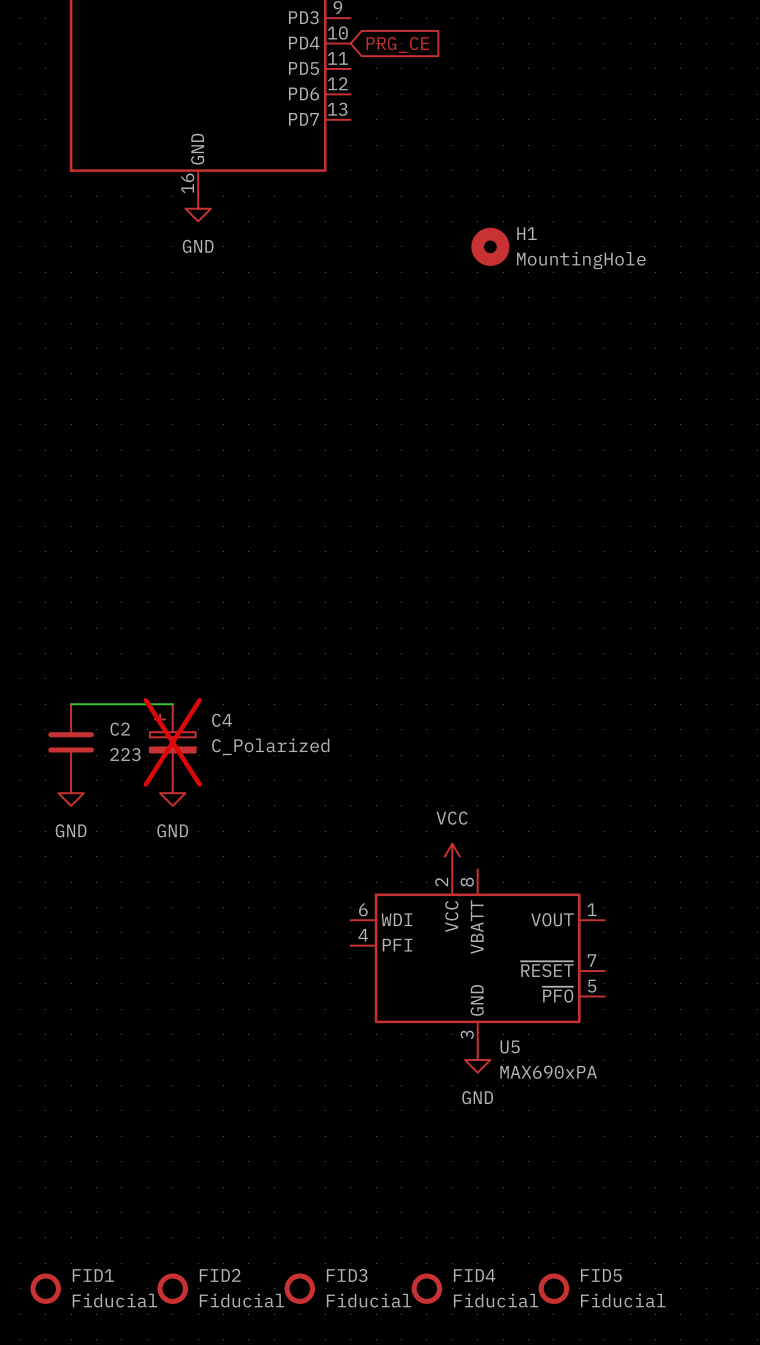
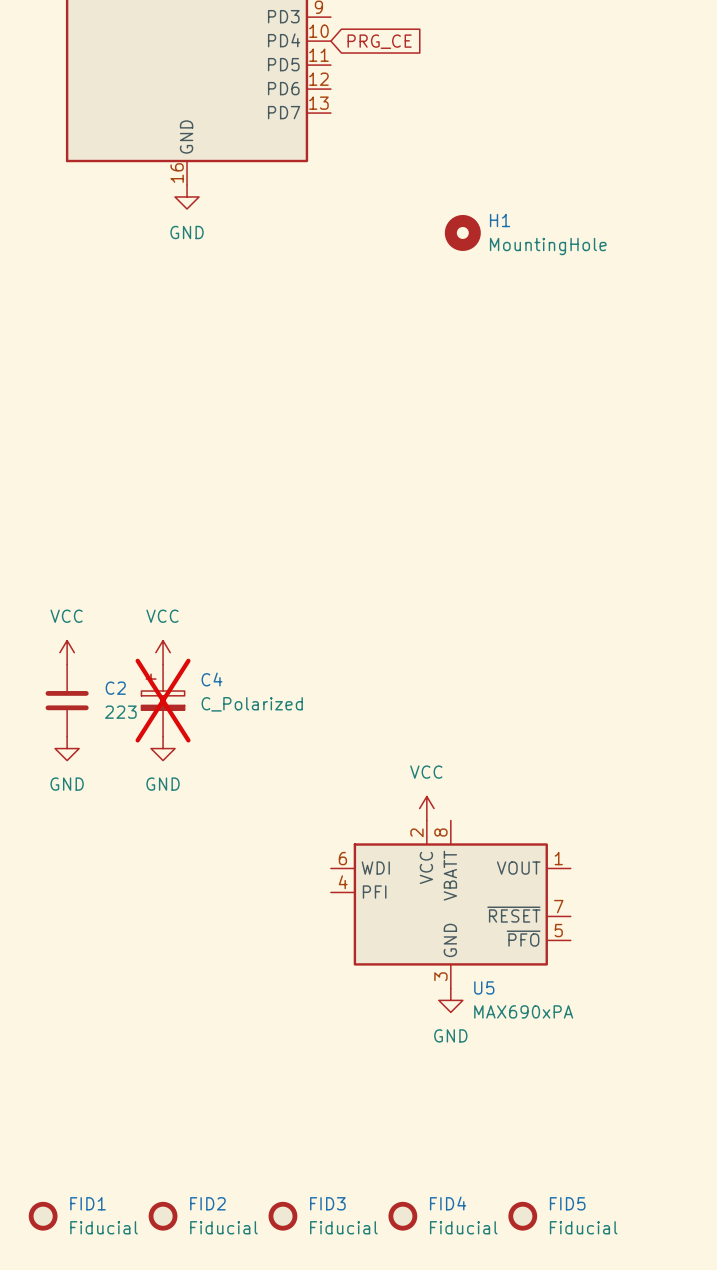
power symbol: none -> VCC (67, 652)
power symbol: none -> VCC (163, 652)
wire: (71, 704) (172, 704) -> none

